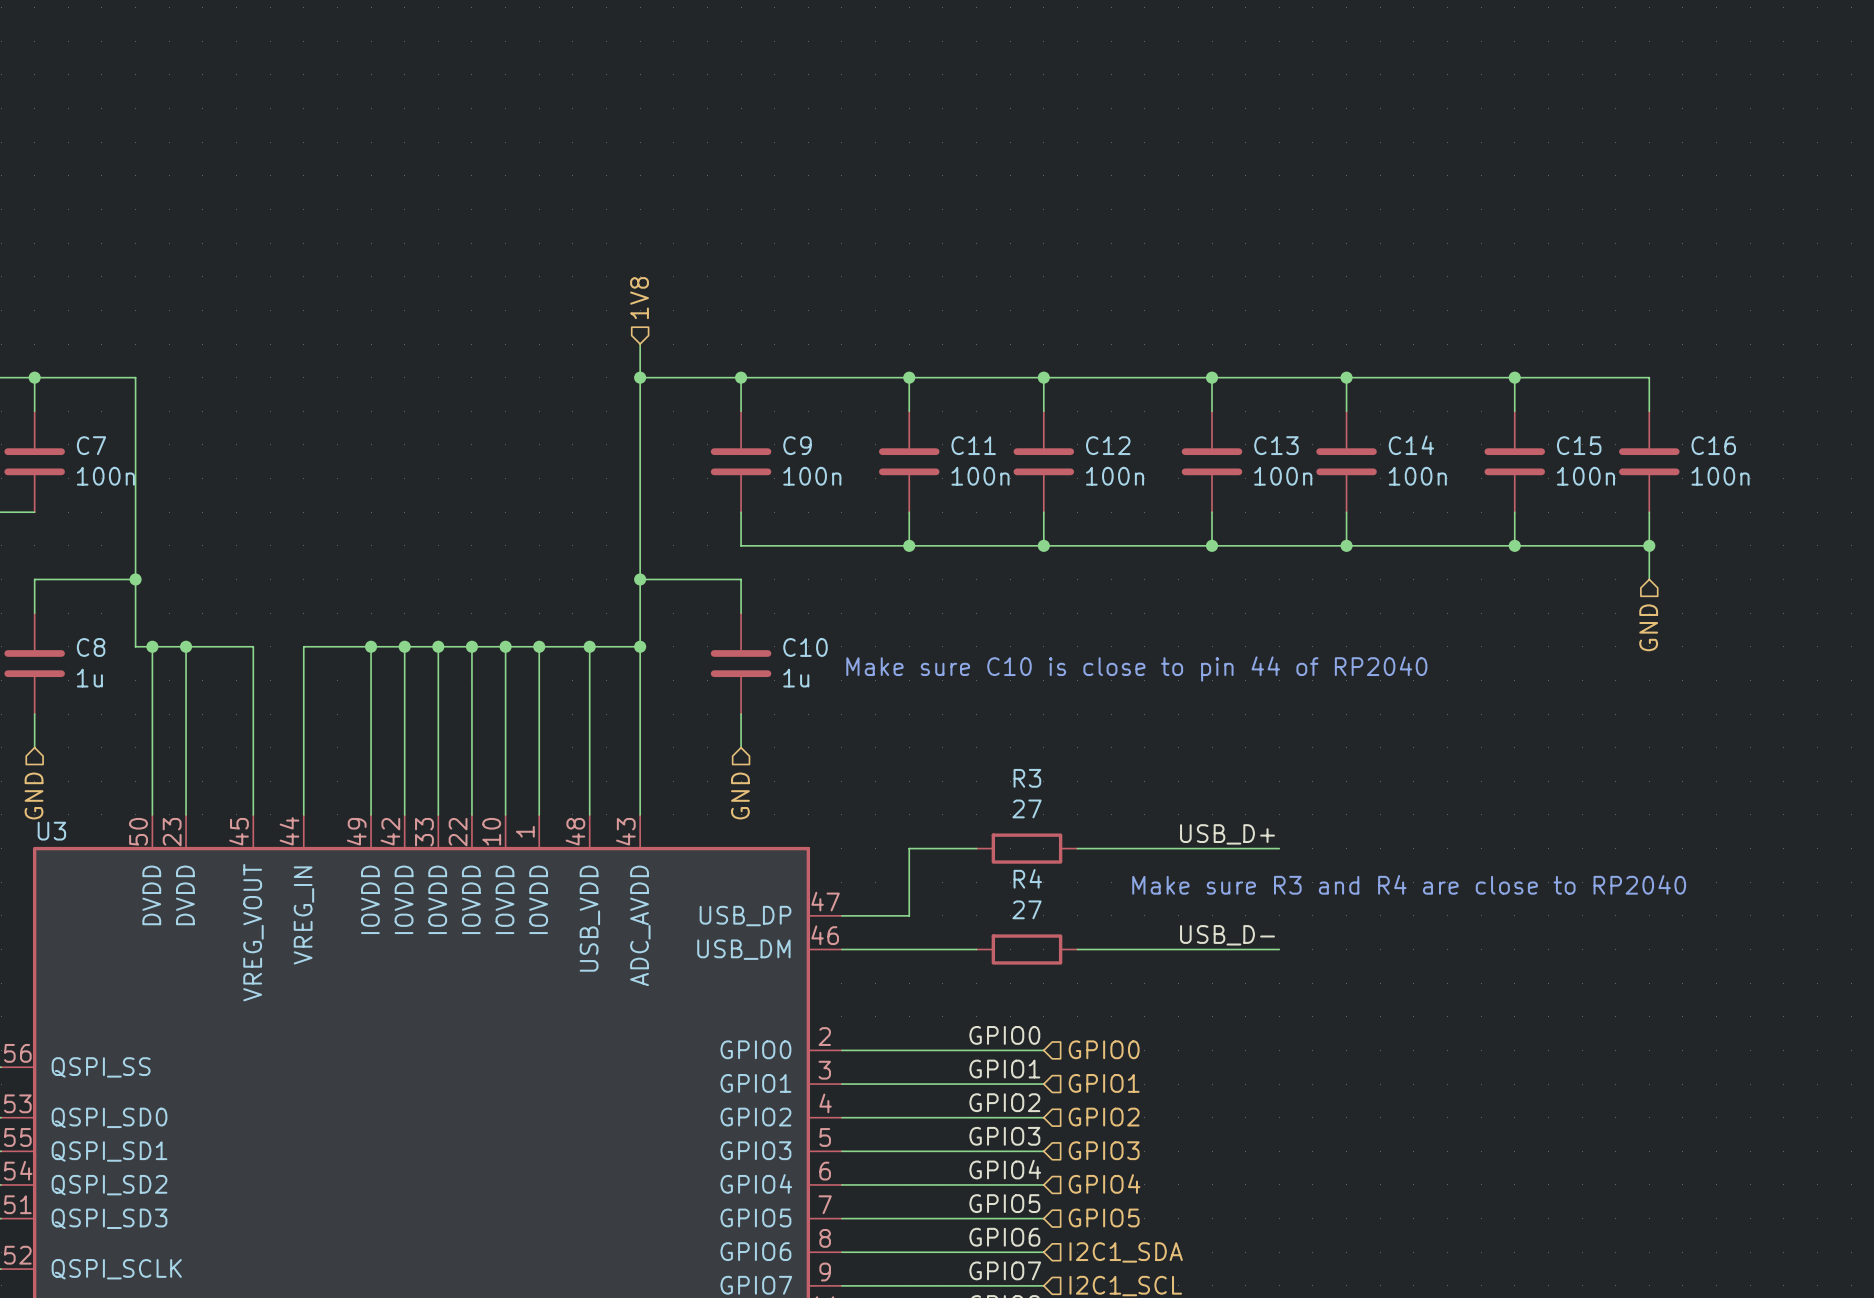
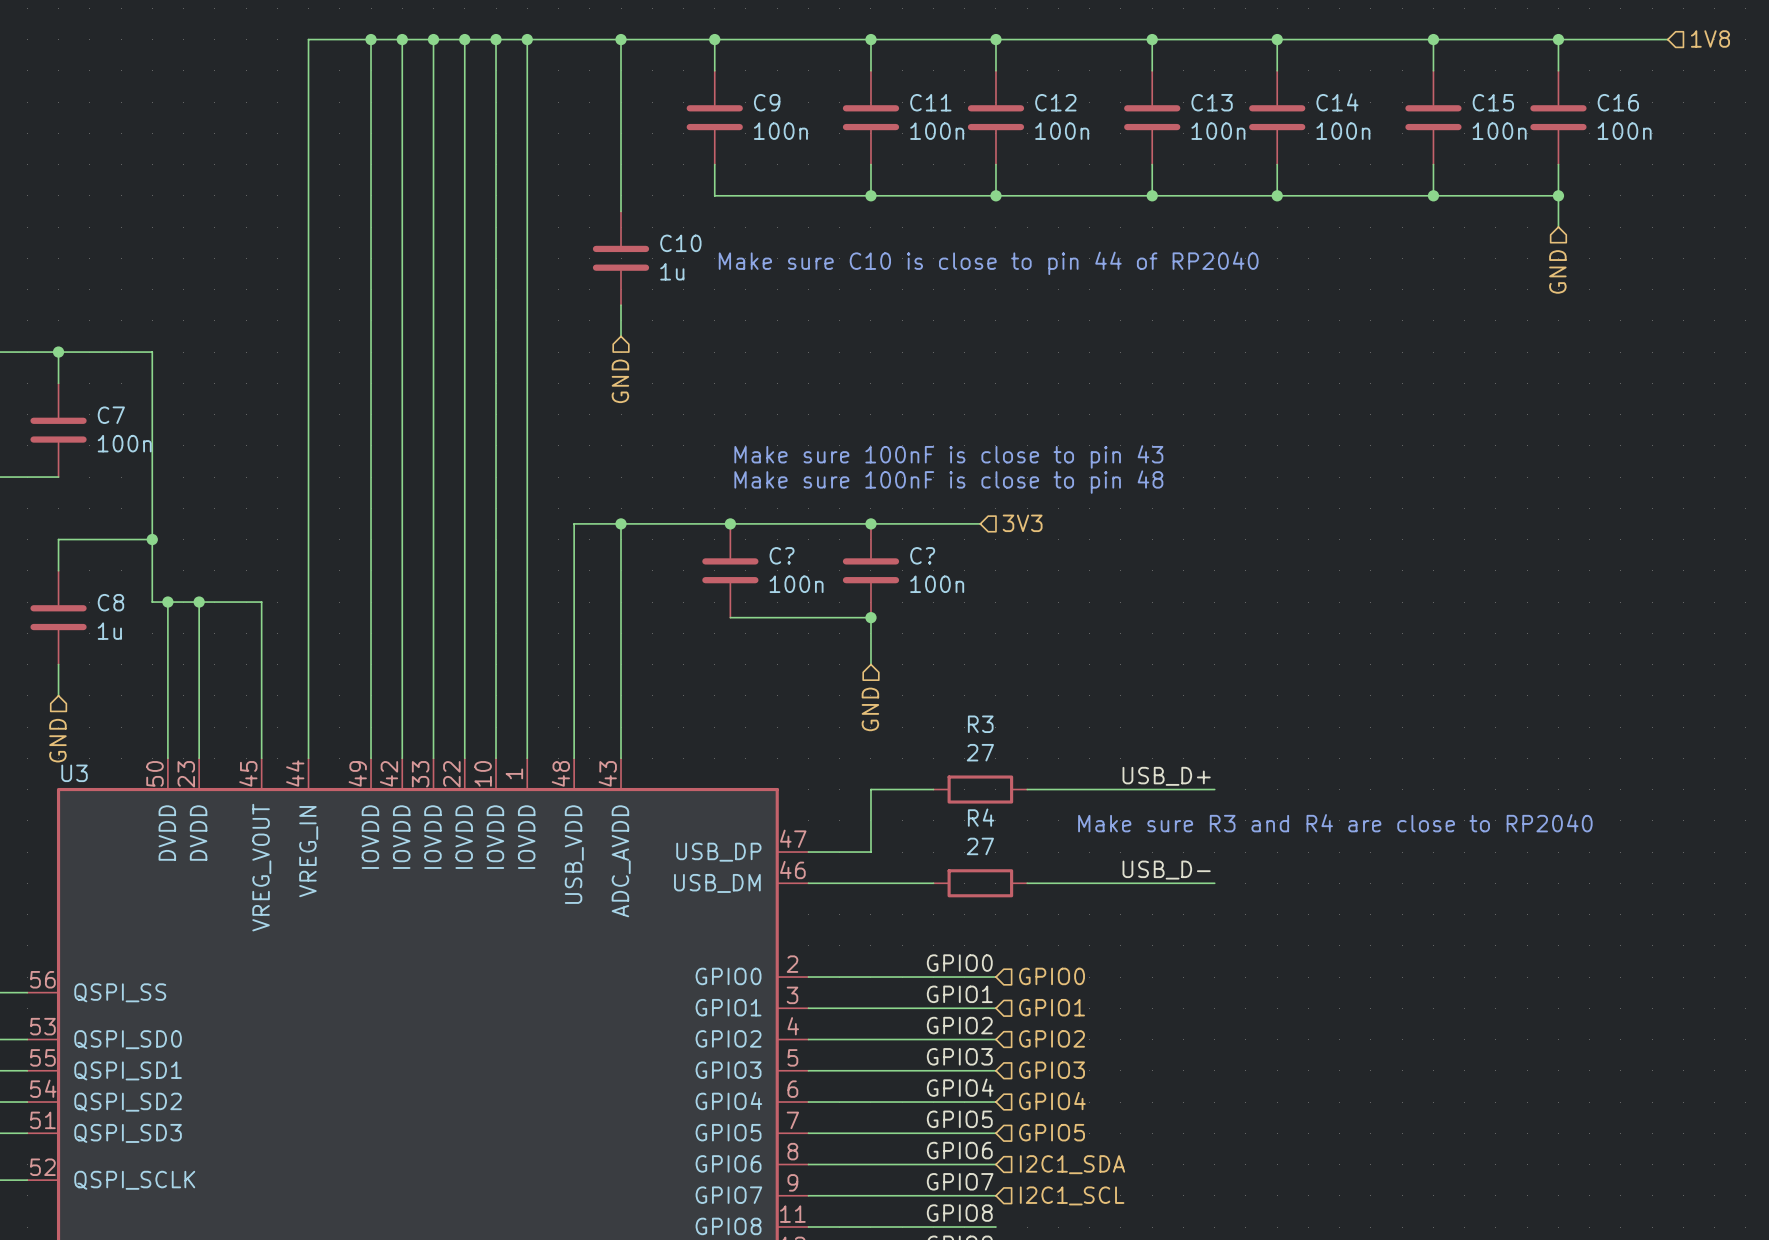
hierarchical label: none -> 1V8 (1710, 38)
wire: none -> (371, 39) (371, 602)
junction: none -> (371, 39)
wire: none -> (402, 39) (402, 602)
junction: none -> (402, 39)
wire: none -> (433, 39) (433, 602)
junction: none -> (433, 39)
wire: none -> (464, 39) (464, 602)
junction: none -> (464, 39)
wire: none -> (496, 39) (496, 602)
junction: none -> (496, 39)
wire: none -> (527, 39) (527, 602)
junction: none -> (527, 39)
wire: none -> (621, 39) (621, 211)
junction: none -> (621, 39)
wire: none -> (714, 39) (714, 70)
junction: none -> (714, 39)
wire: none -> (870, 39) (870, 70)
junction: none -> (870, 39)
wire: none -> (995, 39) (995, 70)
junction: none -> (995, 39)
wire: none -> (1152, 39) (1152, 70)
junction: none -> (1152, 39)
wire: none -> (1277, 39) (1277, 70)
junction: none -> (1277, 39)
wire: none -> (1433, 39) (1433, 70)
junction: none -> (1433, 39)
wire: none -> (1558, 39) (1558, 70)
junction: none -> (1558, 39)
wire: none -> (714, 164) (714, 195) (1558, 195)
wire: none -> (1558, 164) (1558, 227)
junction: none -> (870, 195)
junction: none -> (995, 195)
junction: none -> (1152, 195)
junction: none -> (1277, 195)
junction: none -> (1433, 195)
junction: none -> (1558, 195)
text: none -> Make sure C10 is close to pin 44 of RP2040 (988, 263)
hierarchical label: none -> GND (1557, 271)
hierarchical label: 1V8 (639, 298) -> none
wire: none -> (621, 305) (621, 320)
wire: (640, 360) (640, 562) -> none
wire: (640, 377) (1649, 377) (1649, 411) -> none
junction: (640, 377) -> none
wire: (741, 377) (741, 411) -> none
junction: (741, 377) -> none
wire: (909, 377) (909, 411) -> (870, 164) (870, 195)
junction: (909, 377) -> none
wire: (1043, 377) (1043, 411) -> (995, 164) (995, 195)
junction: (1043, 377) -> none
wire: (1212, 377) (1212, 411) -> (1152, 164) (1152, 195)
junction: (1212, 377) -> none
wire: (1346, 377) (1346, 411) -> (1277, 164) (1277, 195)
junction: (1346, 377) -> none
wire: (1514, 377) (1514, 411) -> (1433, 164) (1433, 195)
junction: (1514, 377) -> none
hierarchical label: none -> GND (620, 381)
C9 position: (741, 461) -> (714, 117)
C11 position: (909, 461) -> (870, 117)
C12 position: (1043, 461) -> (995, 117)
C13 position: (1212, 461) -> (1152, 117)
C14 position: (1346, 461) -> (1277, 117)
C15 position: (1514, 461) -> (1433, 117)
C16 position: (1649, 461) -> (1558, 117)
text: none -> Make sure 100nF is close to pin 43 (948, 456)
wire: (741, 512) (741, 545) (1649, 545) -> none
wire: (909, 512) (909, 545) -> none
wire: (1043, 512) (1043, 545) -> none
wire: (1212, 512) (1212, 545) -> none
wire: (1346, 512) (1346, 545) -> none
wire: (1514, 512) (1514, 545) -> none
wire: (1649, 512) (1649, 579) -> none
text: none -> Make sure 100nF is close to pin 48 (948, 482)
junction position: (909, 545) -> (870, 523)
junction: (1043, 545) -> none
junction: (1212, 545) -> none
junction: (1346, 545) -> none
junction: (1514, 545) -> none
junction: (1649, 545) -> none
junction: none -> (730, 523)
wire: none -> (980, 523) (574, 523) (574, 602)
hierarchical label: none -> 3V3 (1022, 523)
wire: (640, 579) (741, 579) (741, 613) -> none
junction position: (640, 579) -> (621, 523)
C?: none -> 100n (730, 570)
C?: none -> 100n (870, 570)
hierarchical label: GND (1648, 627) -> none
wire: (303, 646) (640, 646) -> (308, 602) (308, 39) (1667, 39)
junction: (371, 646) -> none
junction: (404, 646) -> none
junction: (438, 646) -> none
junction: (471, 646) -> none
junction: (505, 646) -> none
junction: (539, 646) -> none
junction: (589, 646) -> none
junction: (640, 646) -> none
C10 position: (741, 663) -> (621, 258)
wire: none -> (730, 617) (870, 617) (870, 664)
junction: none -> (870, 617)
text: Make sure C10 is close to pin 44 of RP2040 (1136, 669) -> none
wire: (741, 714) (741, 747) -> none
hierarchical label position: GND (740, 795) -> GND (870, 709)

